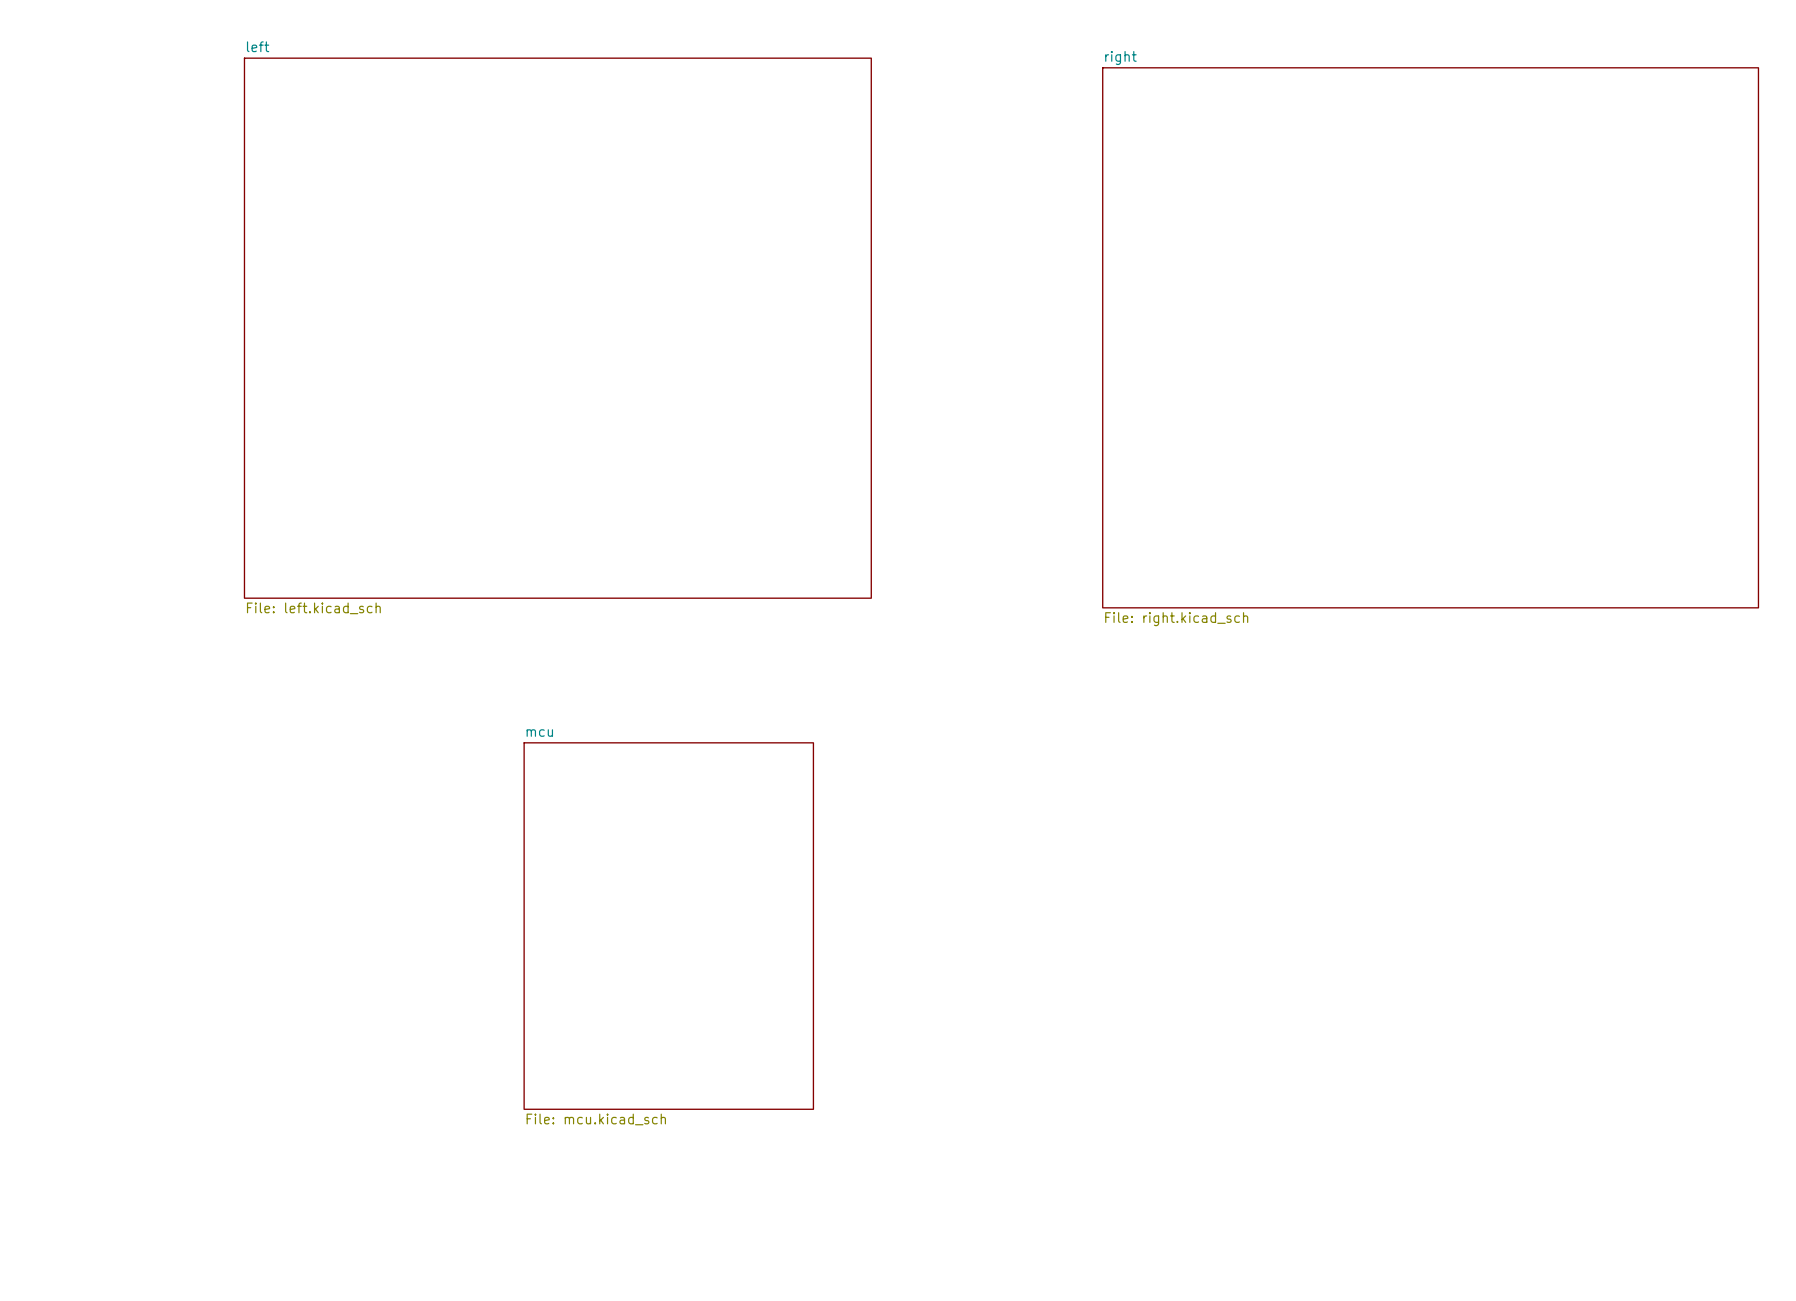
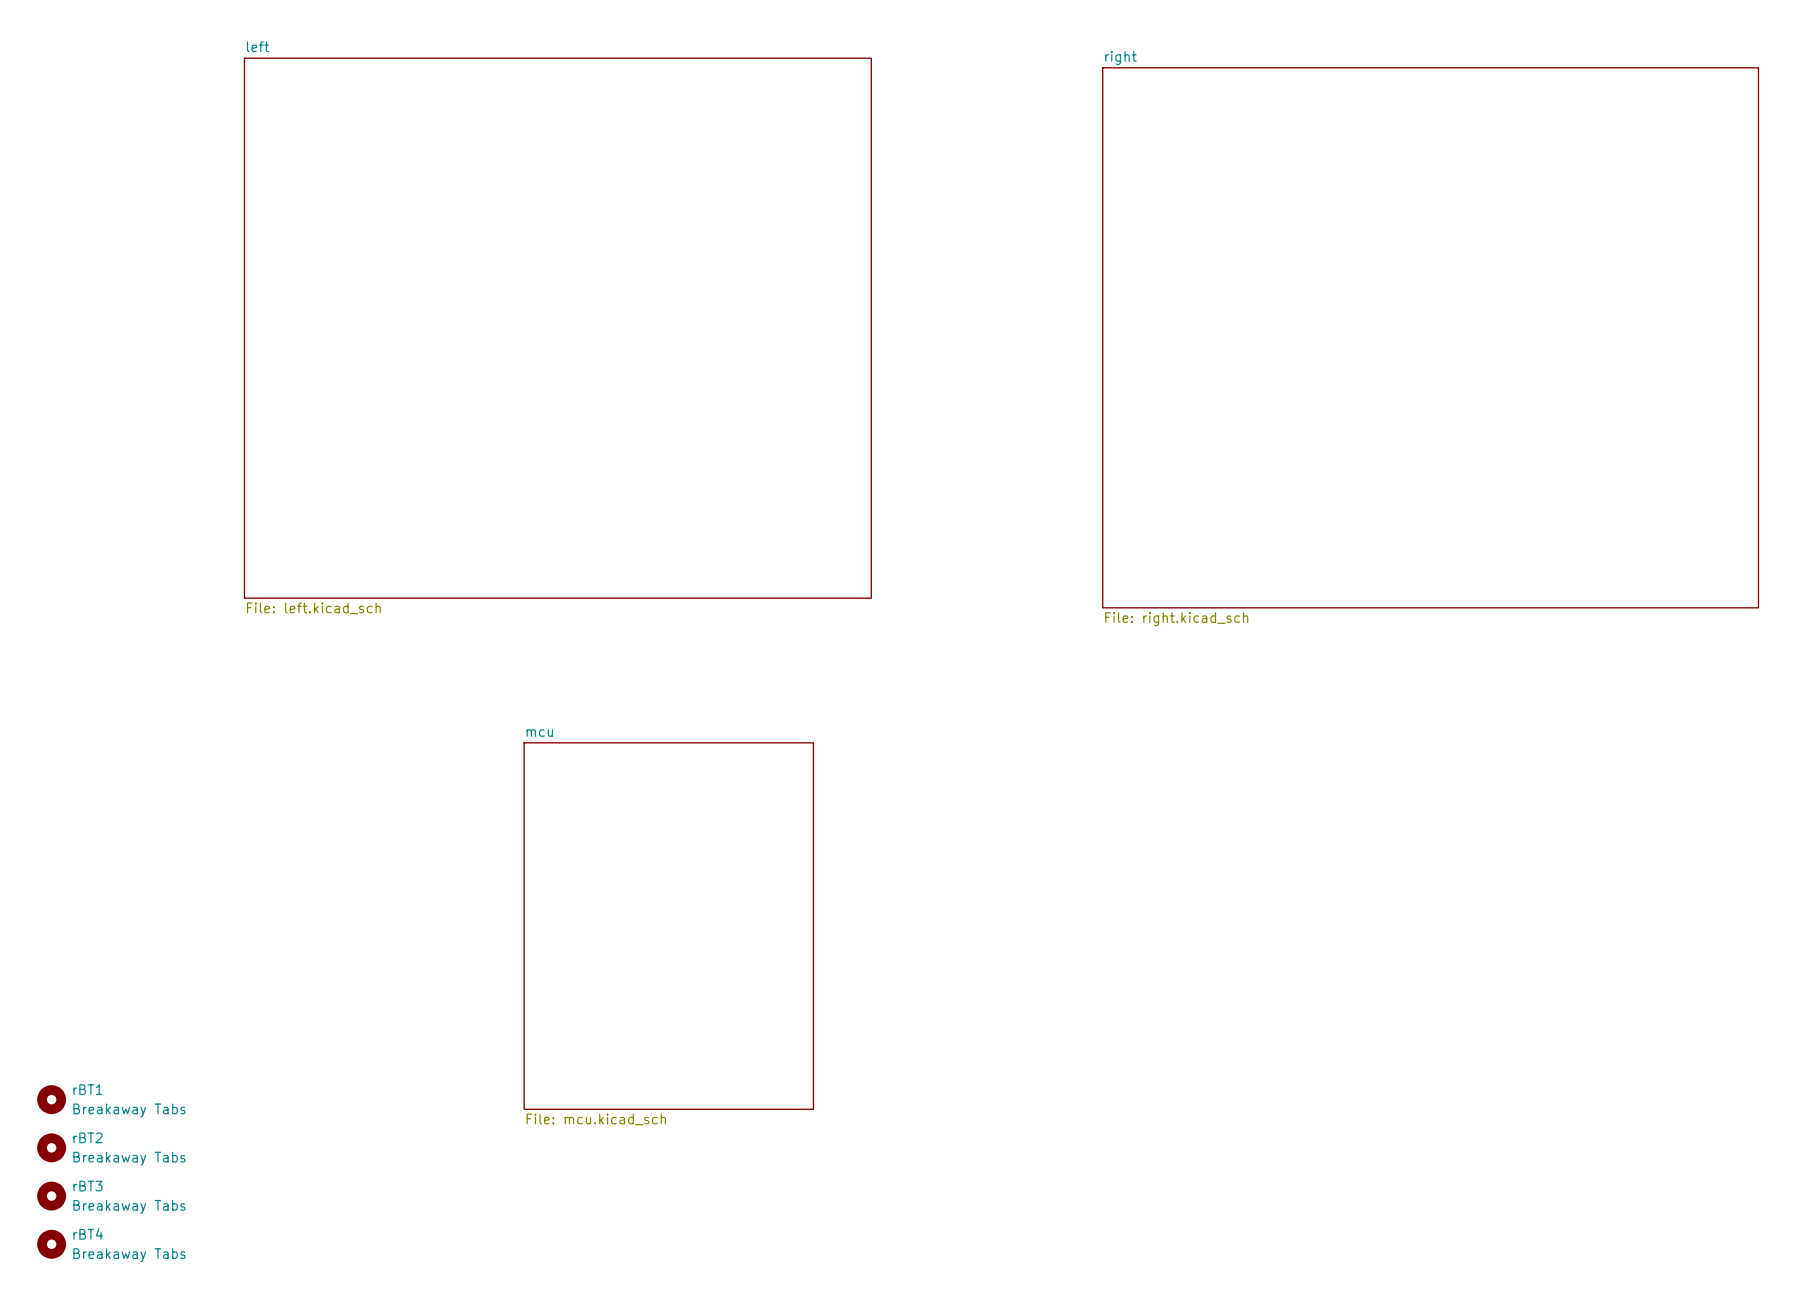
rBT1: none -> Breakaway Tabs (51, 1099)
rBT2: none -> Breakaway Tabs (51, 1147)
rBT3: none -> Breakaway Tabs (51, 1196)
rBT4: none -> Breakaway Tabs (51, 1244)

